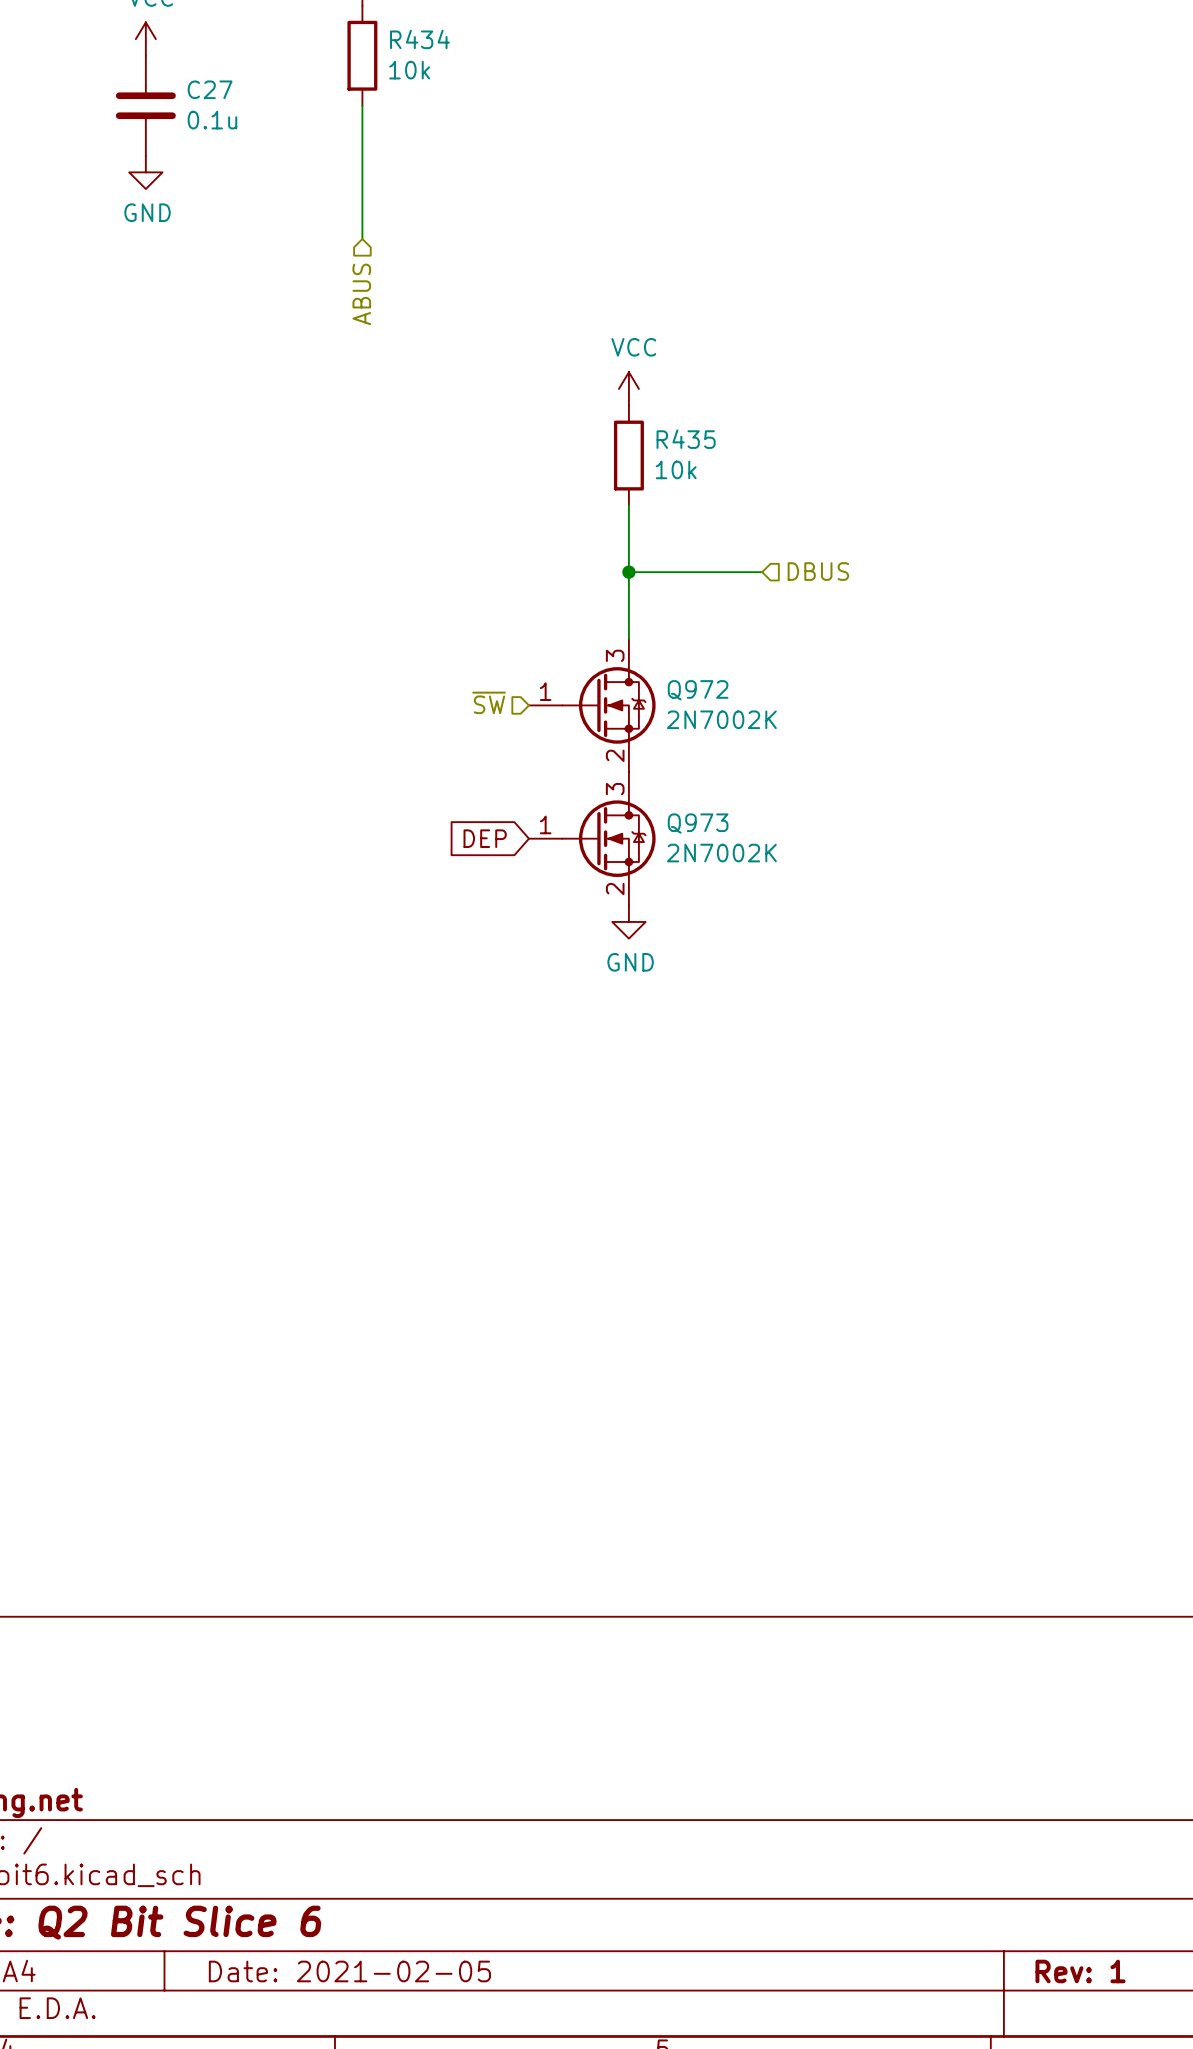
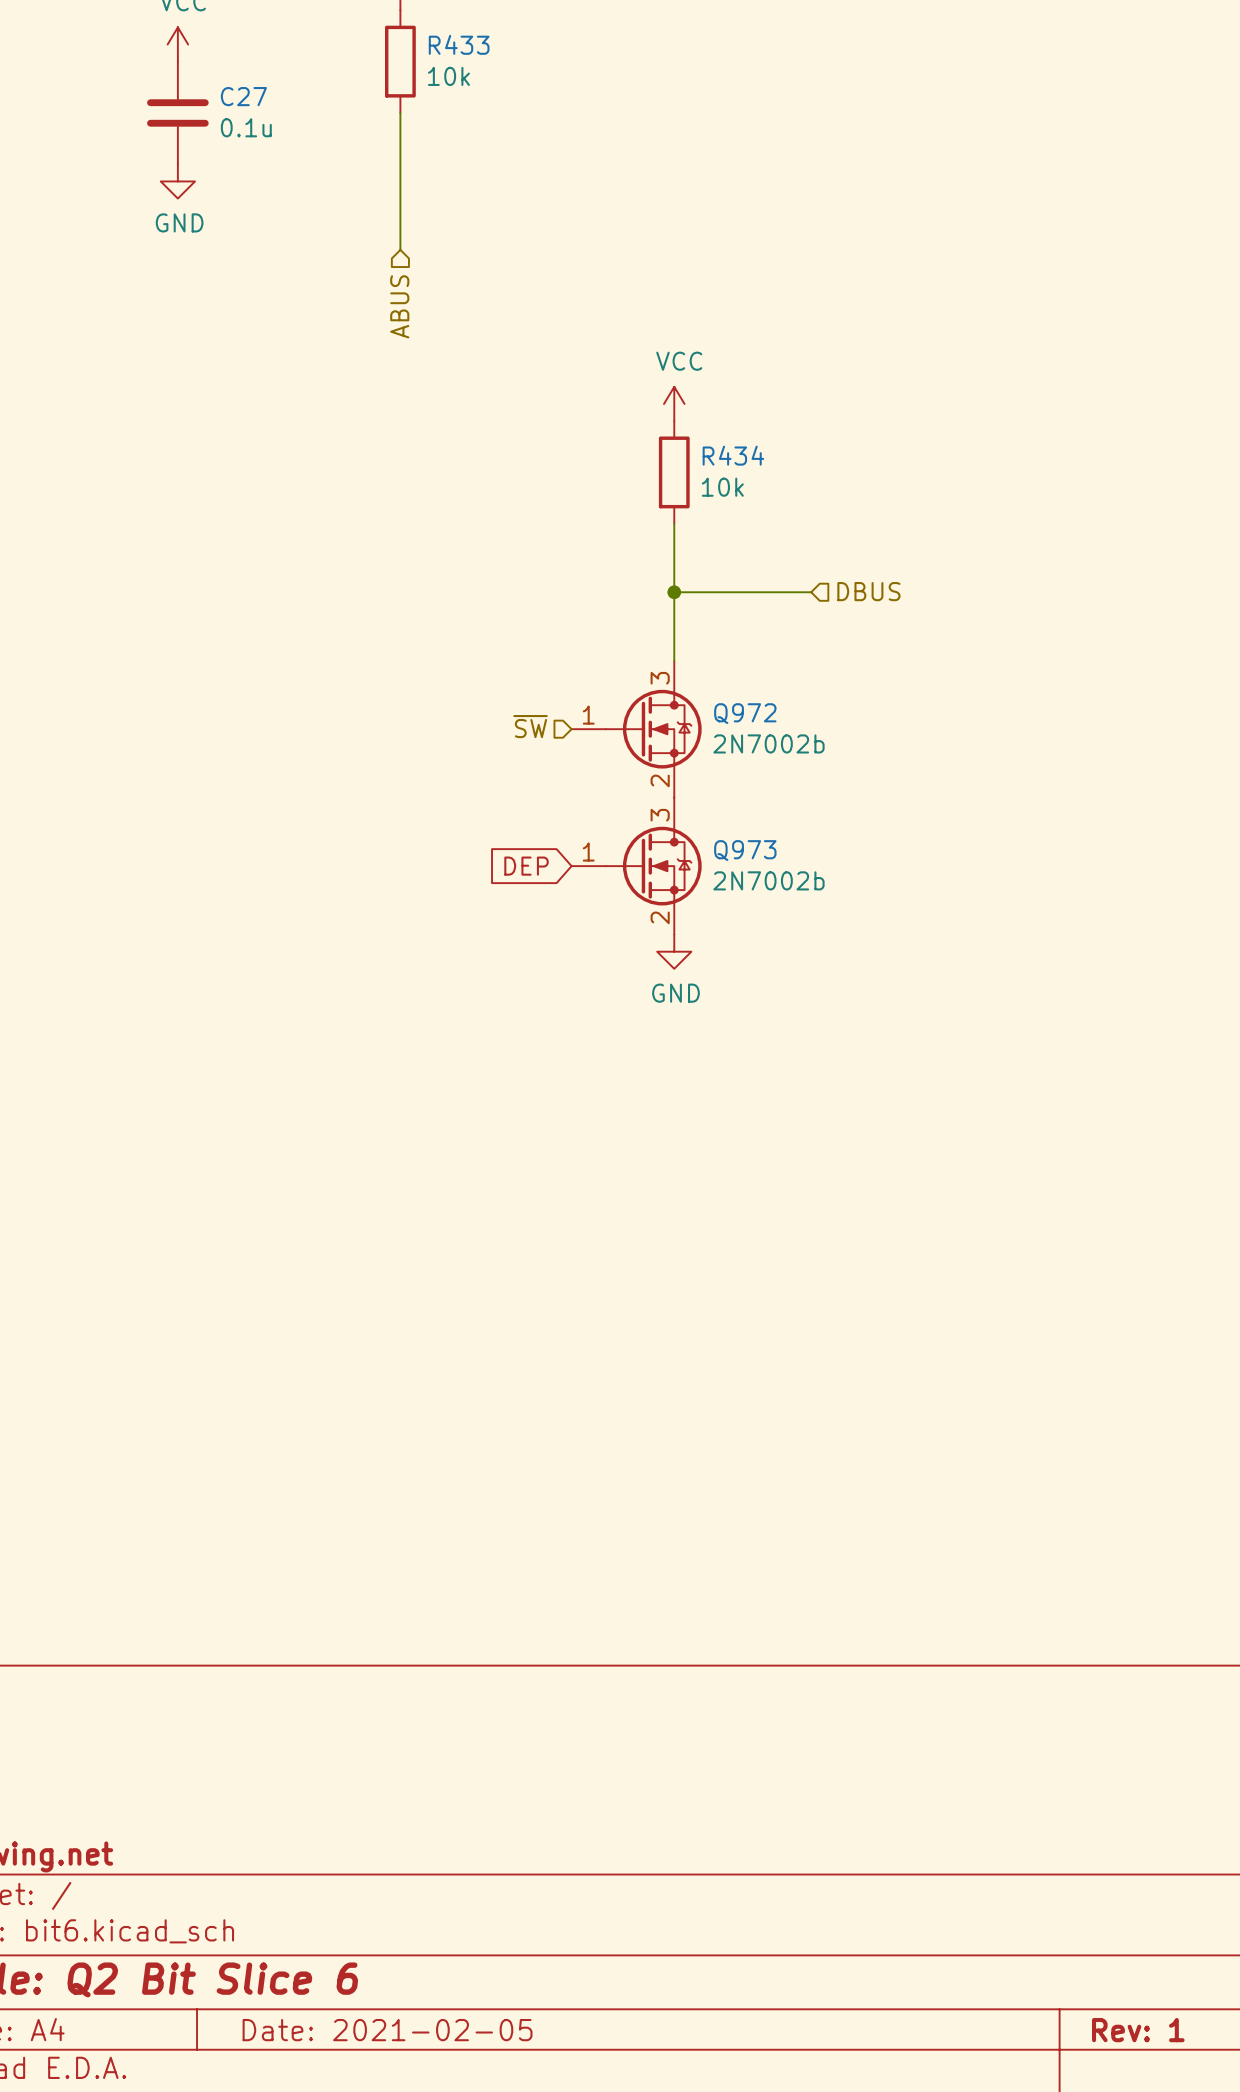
R434 name: R434 (419, 39) -> R433 (459, 44)
R435 name: R435 (686, 439) -> R434 (733, 455)
Q972 value: 2N7002K (721, 719) -> 2N7002b (768, 743)
Q973 value: 2N7002K (721, 853) -> 2N7002b (768, 880)

